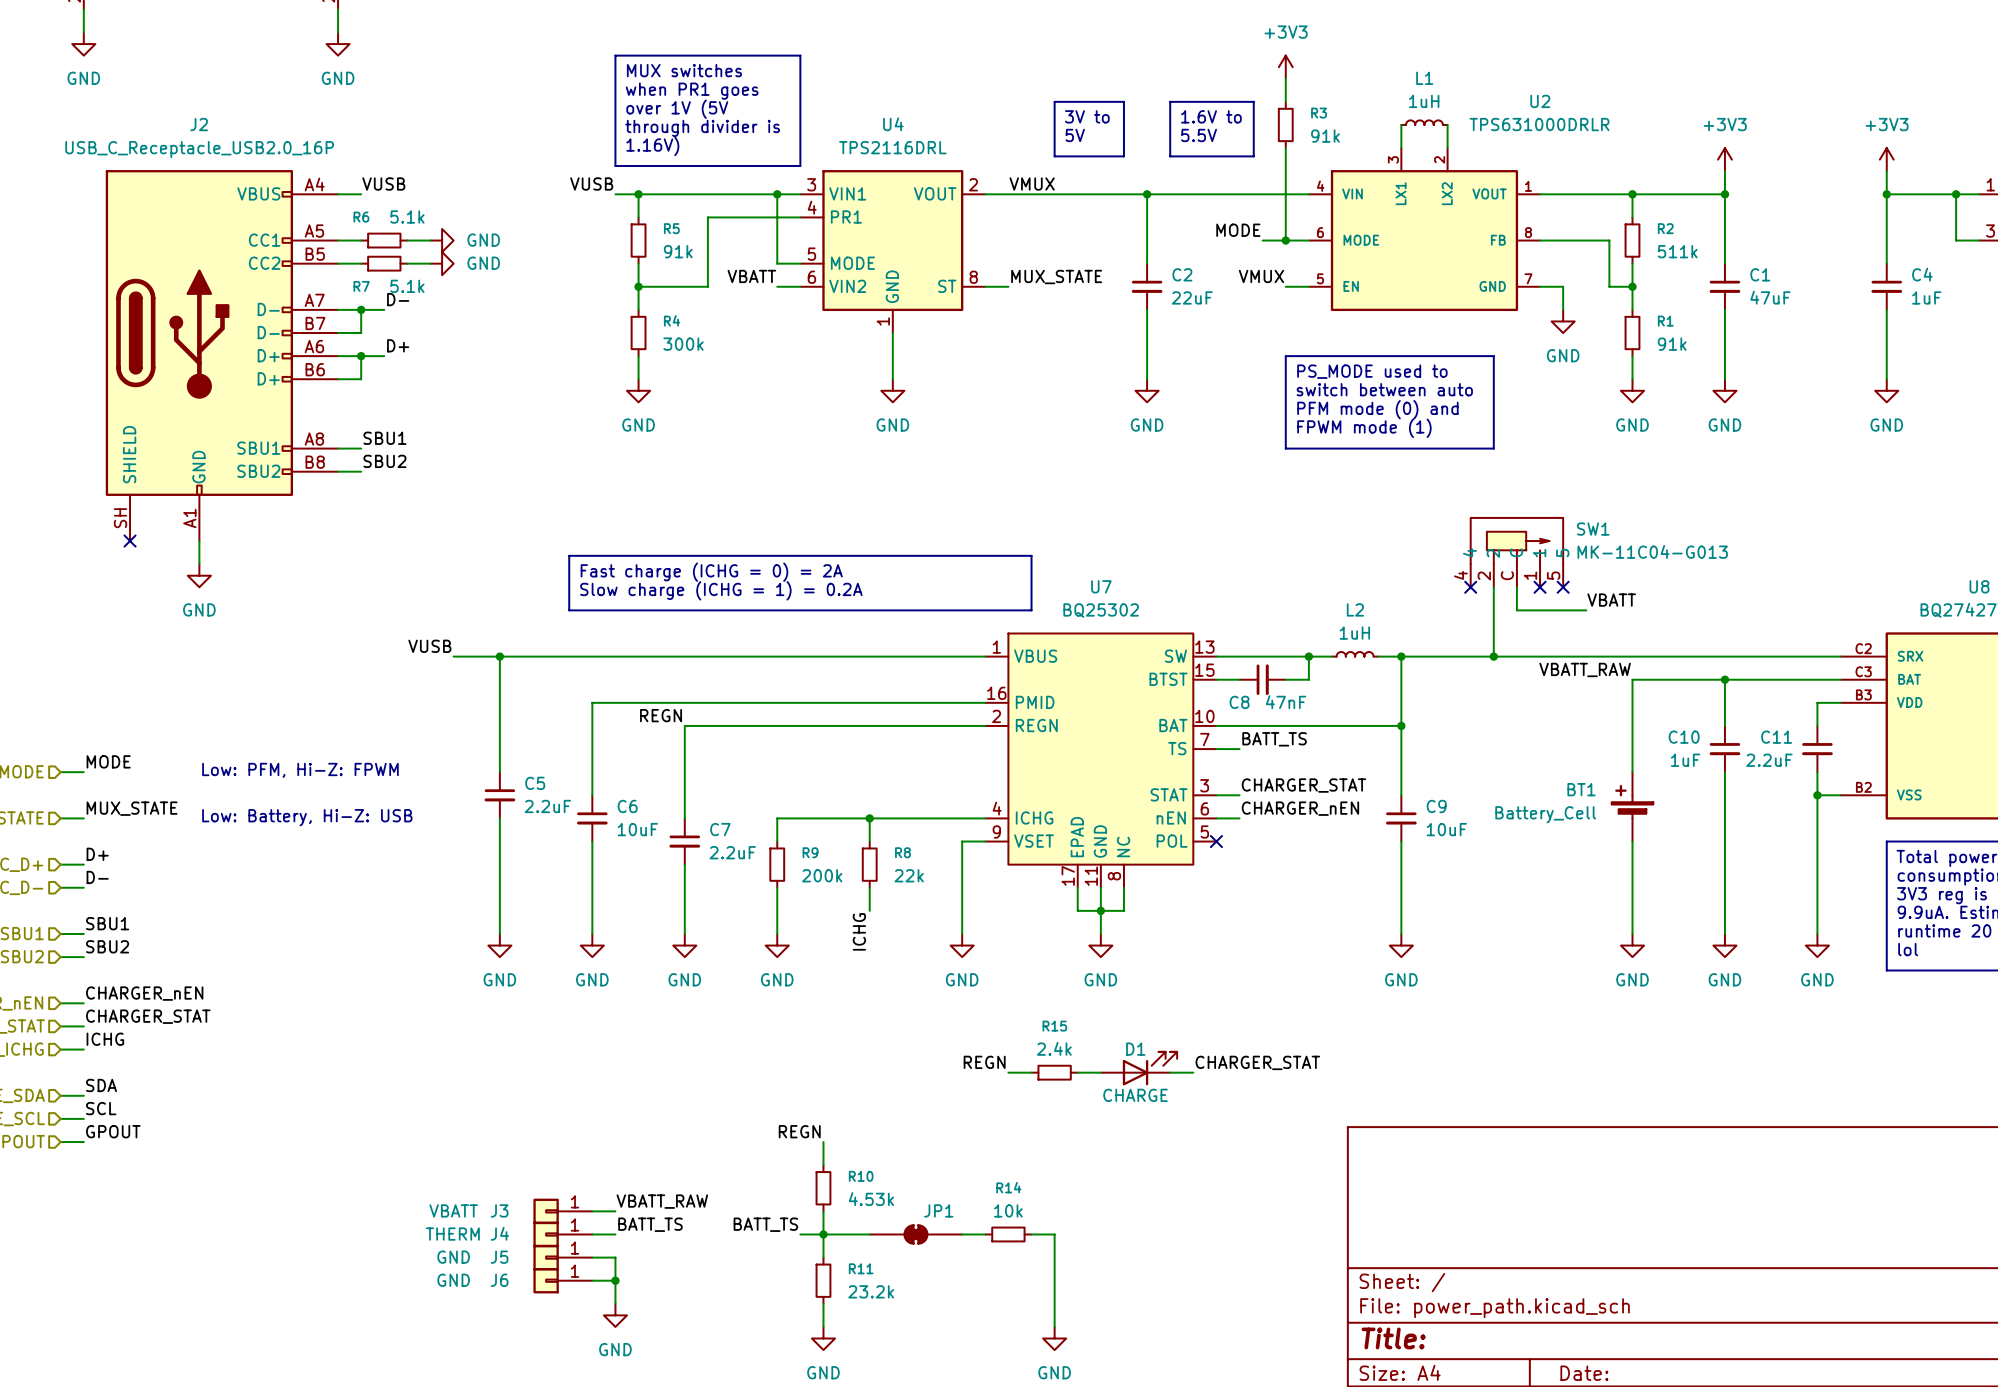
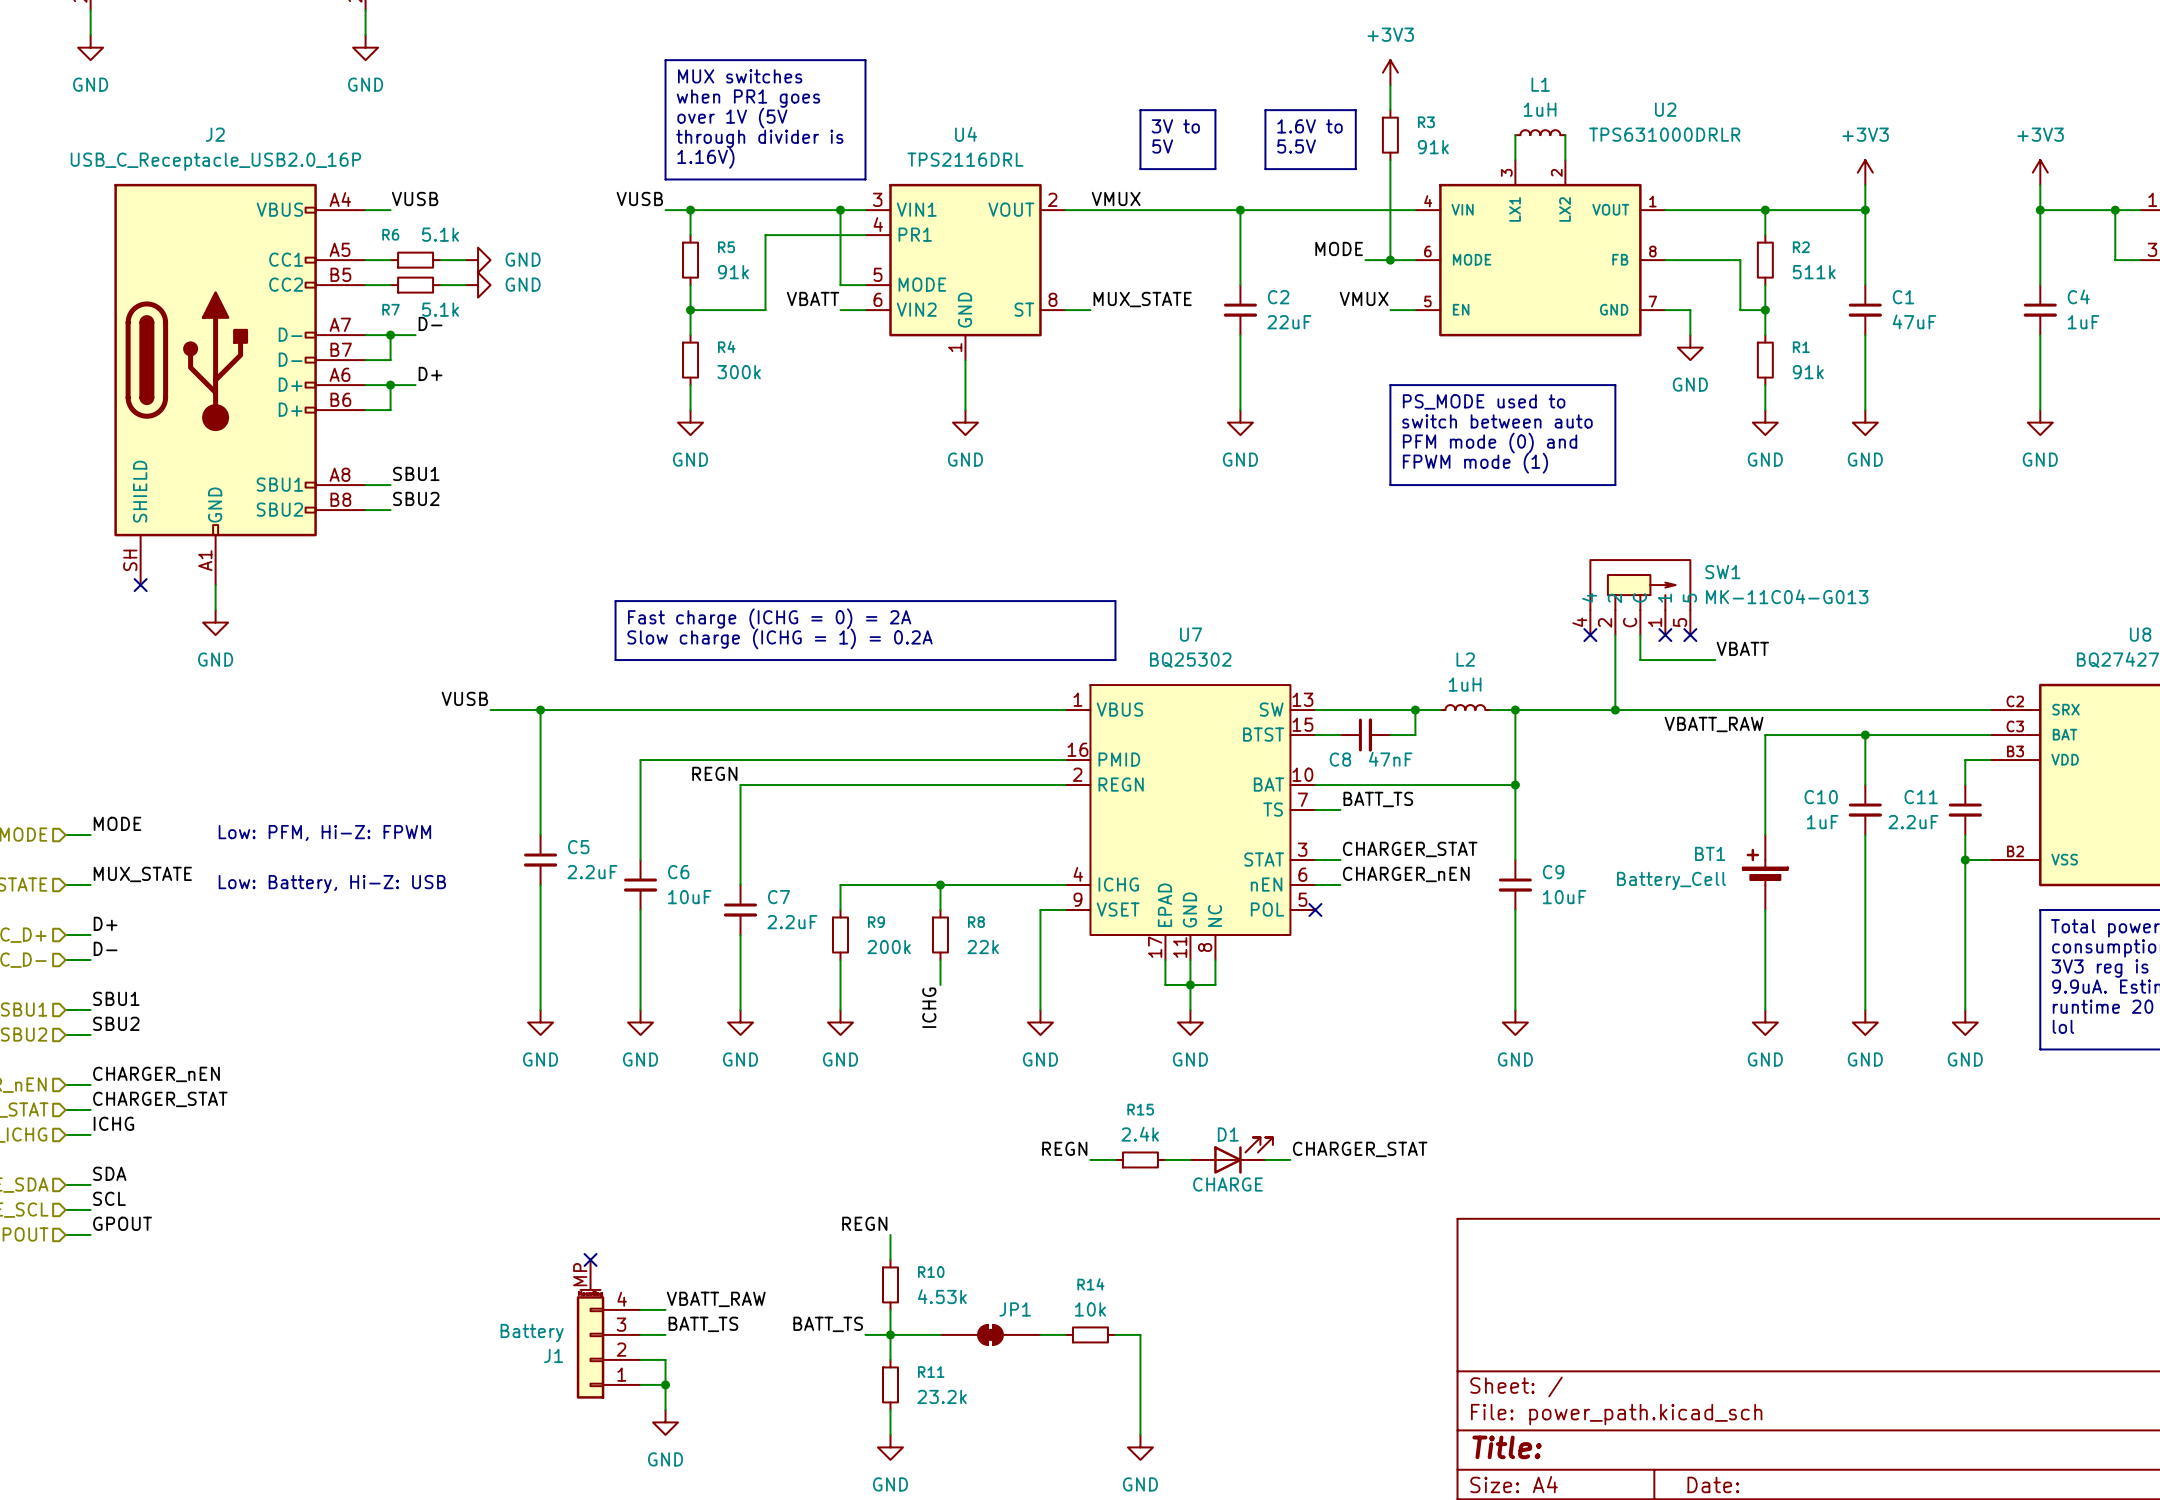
no-connect mark: none -> (590, 1259)
J3: VBATT (562, 1211) -> none
J1: none -> Battery (608, 1329)
J4: THERM (562, 1234) -> none
J5: GND (562, 1257) -> none
J6: GND (562, 1280) -> none

